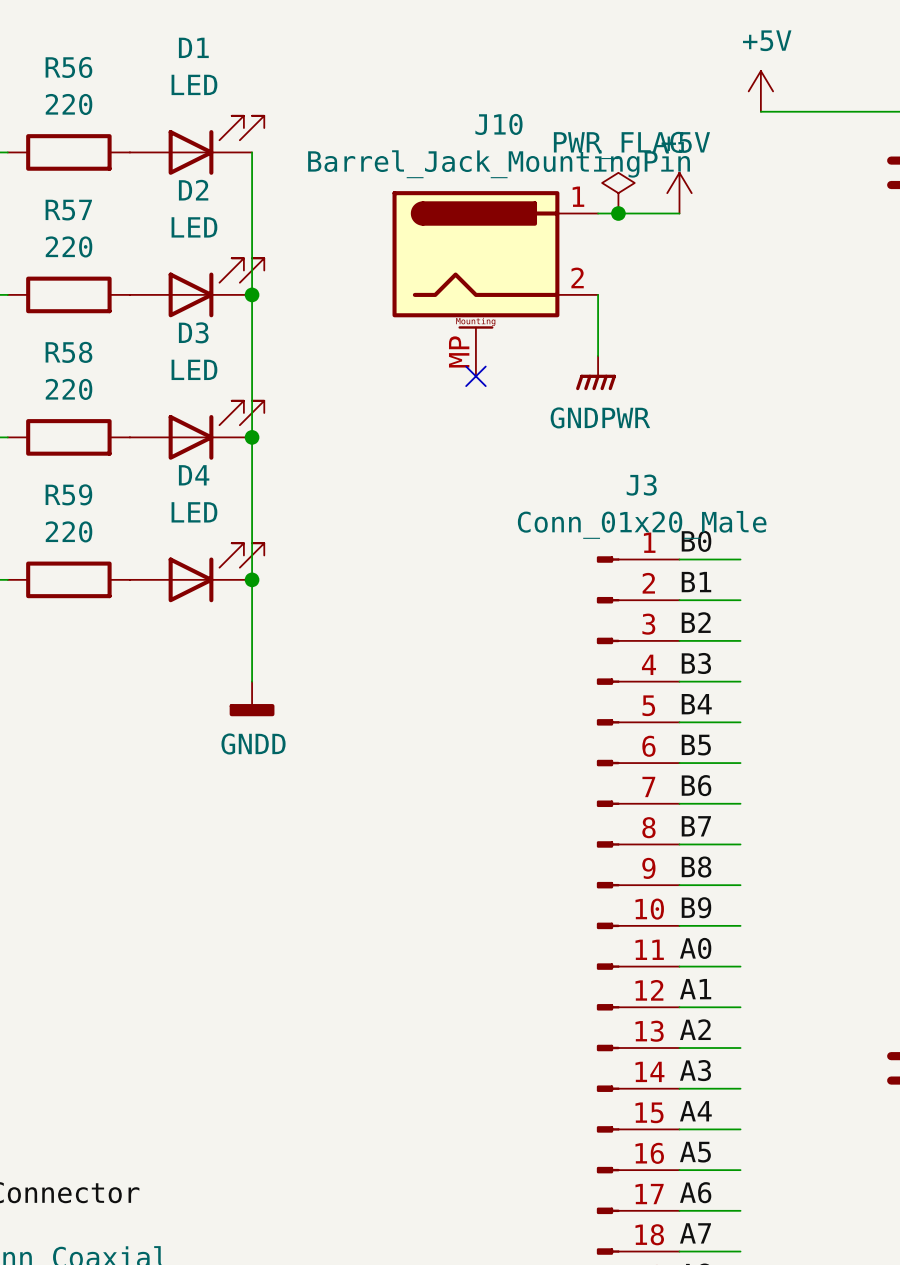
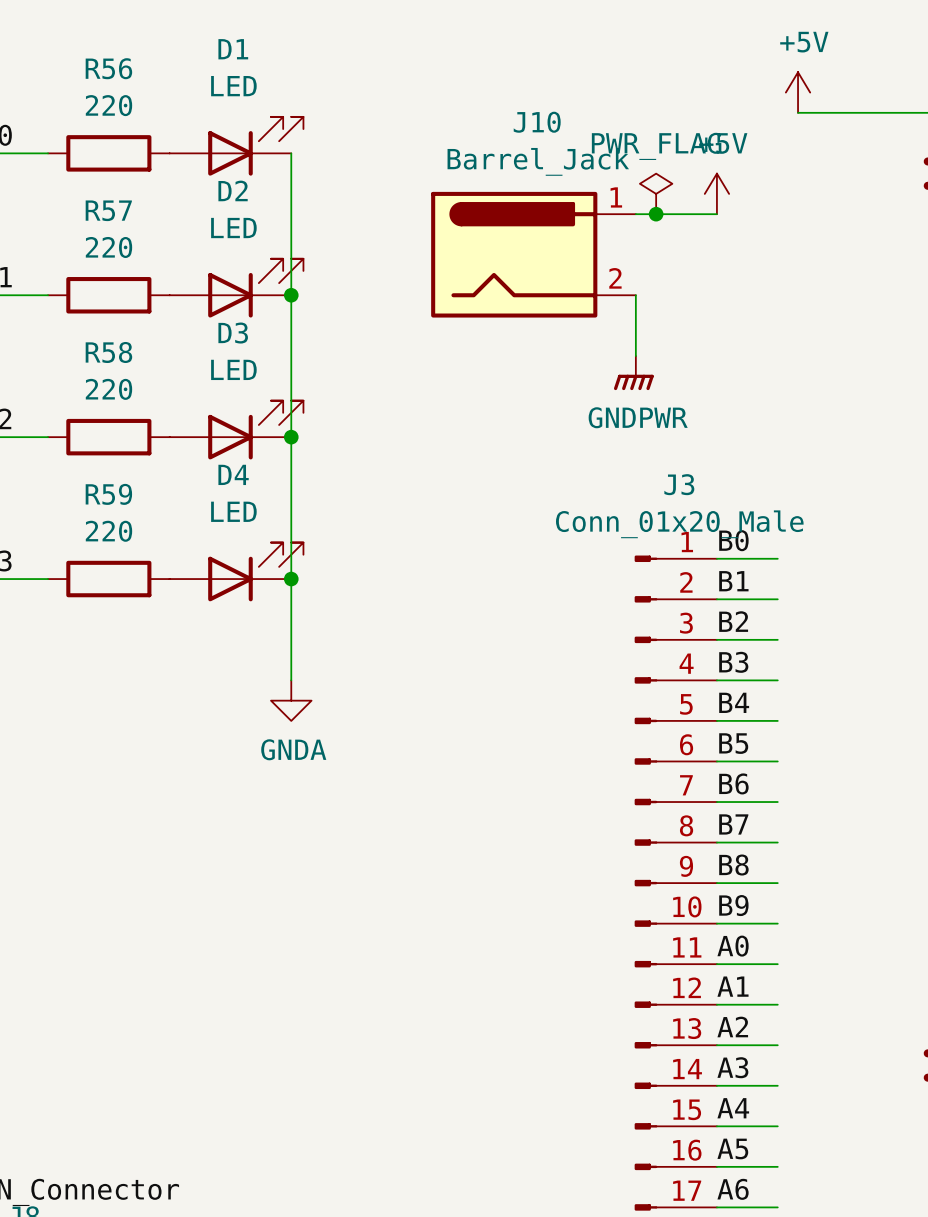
J10 value: Barrel_Jack_MountingPin (499, 164) -> Barrel_Jack (538, 161)
J10 symbol: [392, 191, 599, 377] -> [431, 191, 636, 318]
no-connect mark: (475, 376) -> none
power symbol: GNDD (252, 698) -> GNDA (291, 700)

